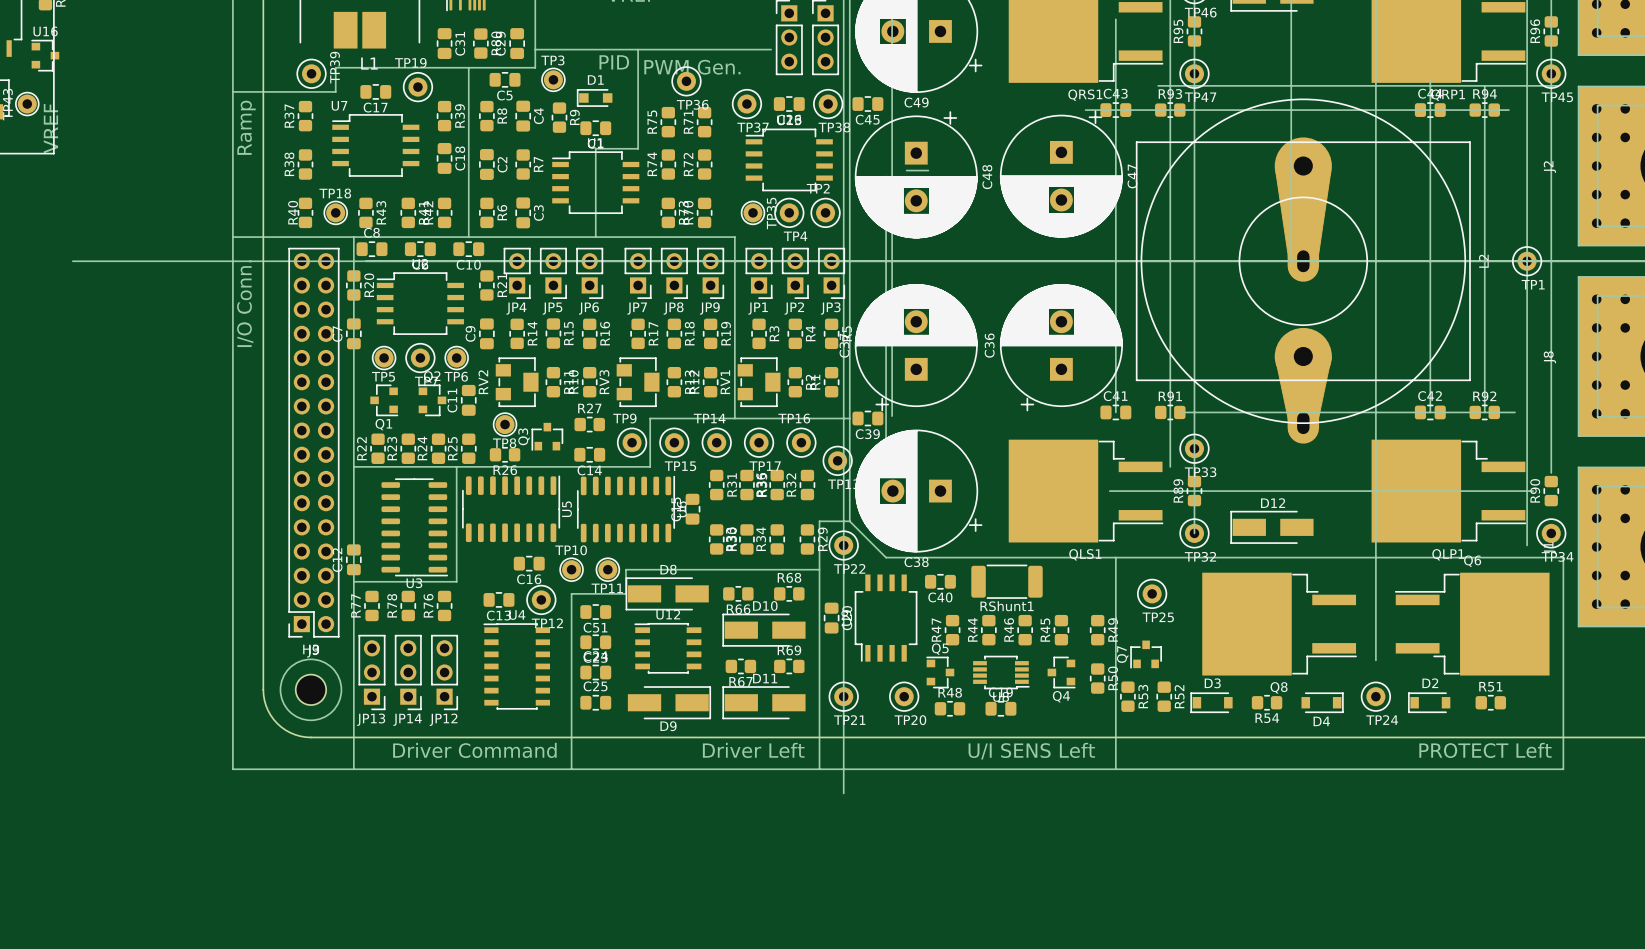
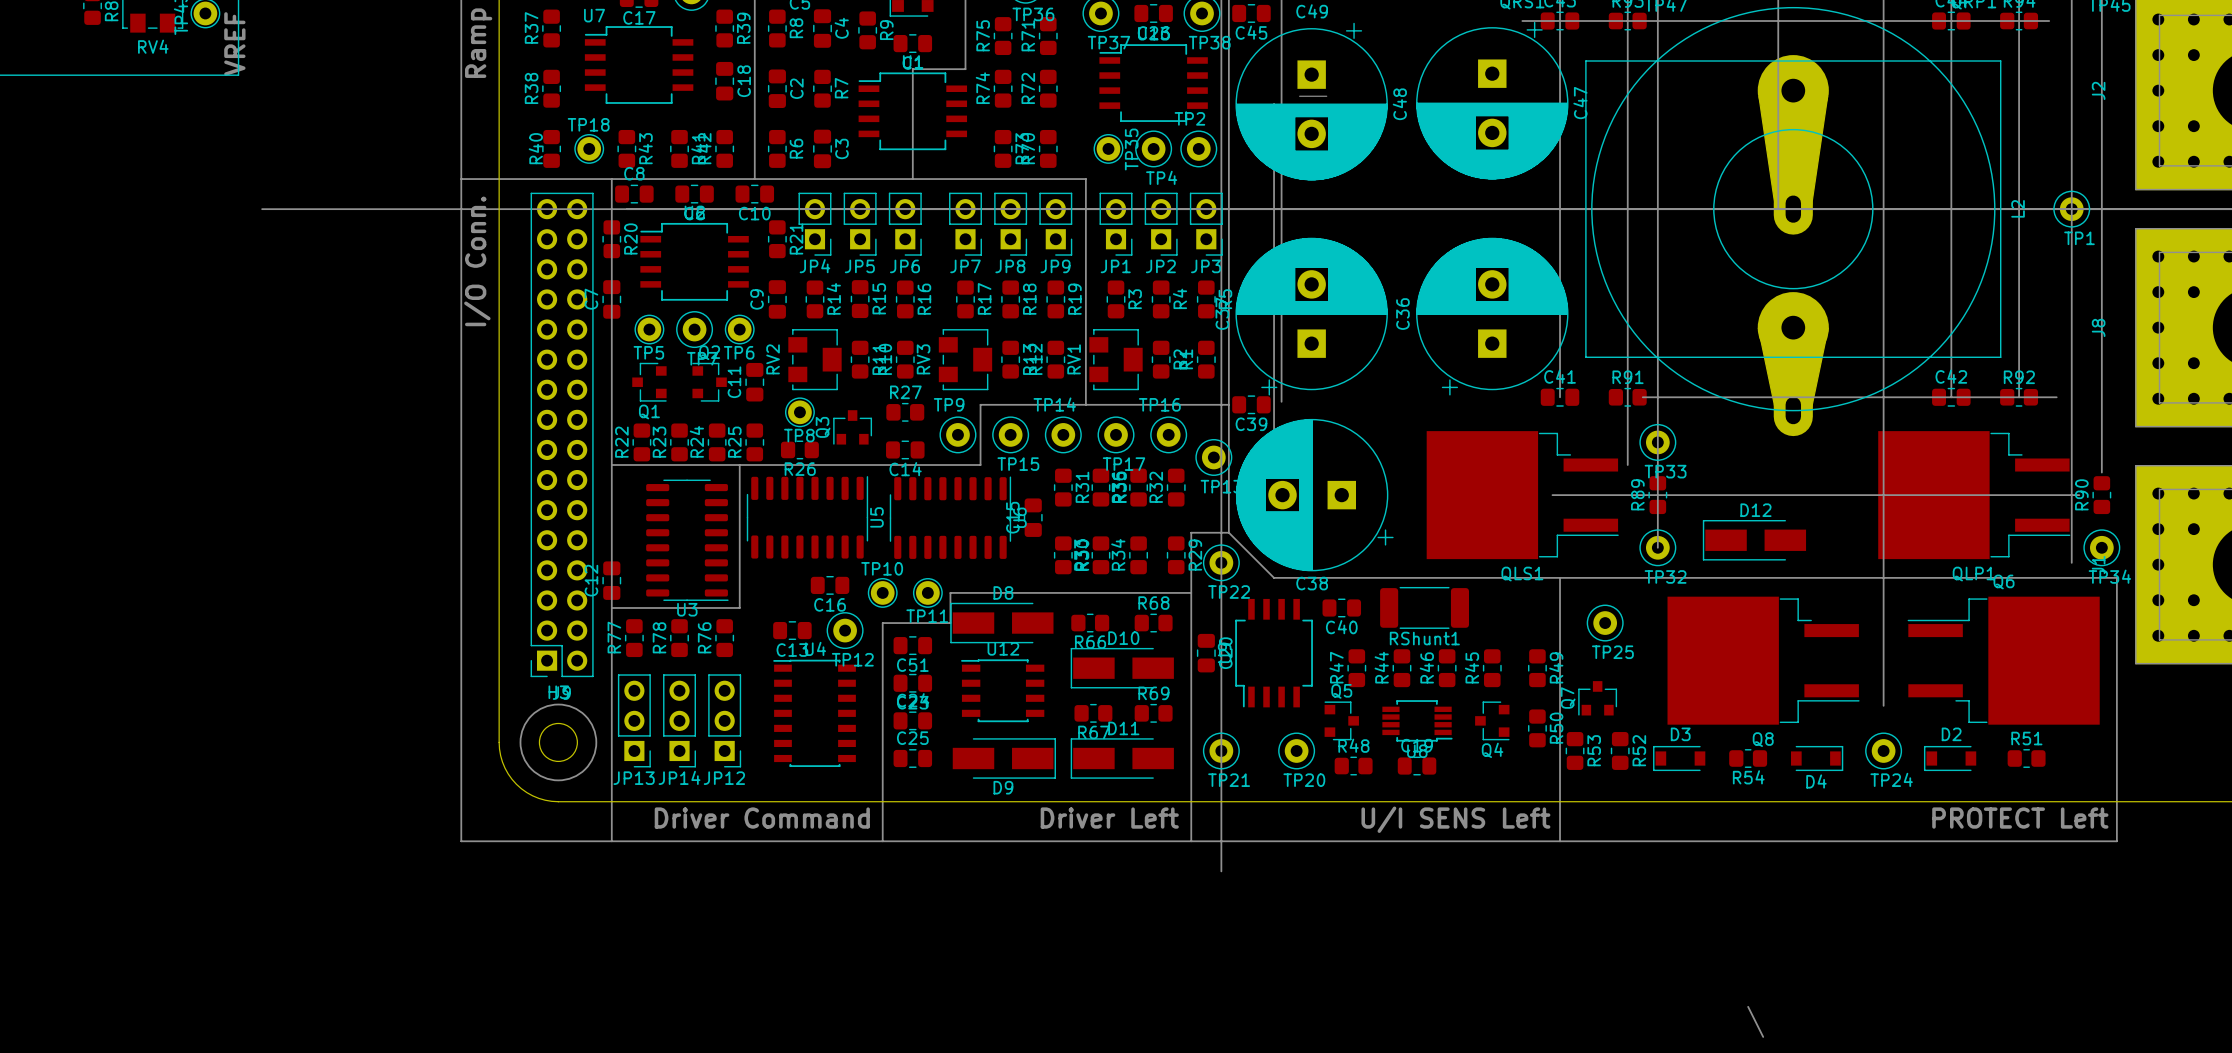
line: none -> (1748, 1006) (1763, 1036)

